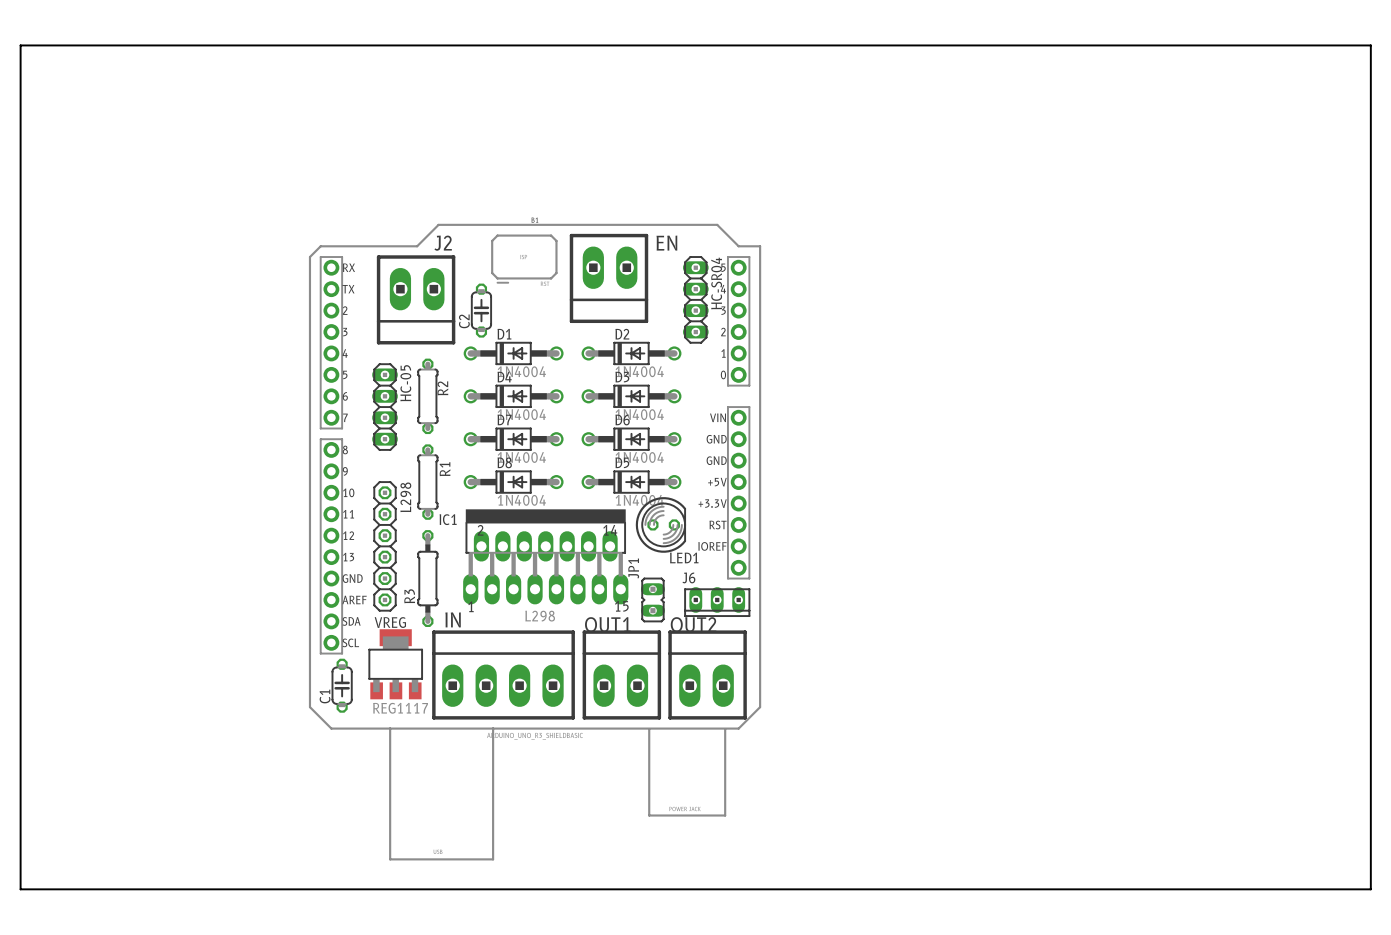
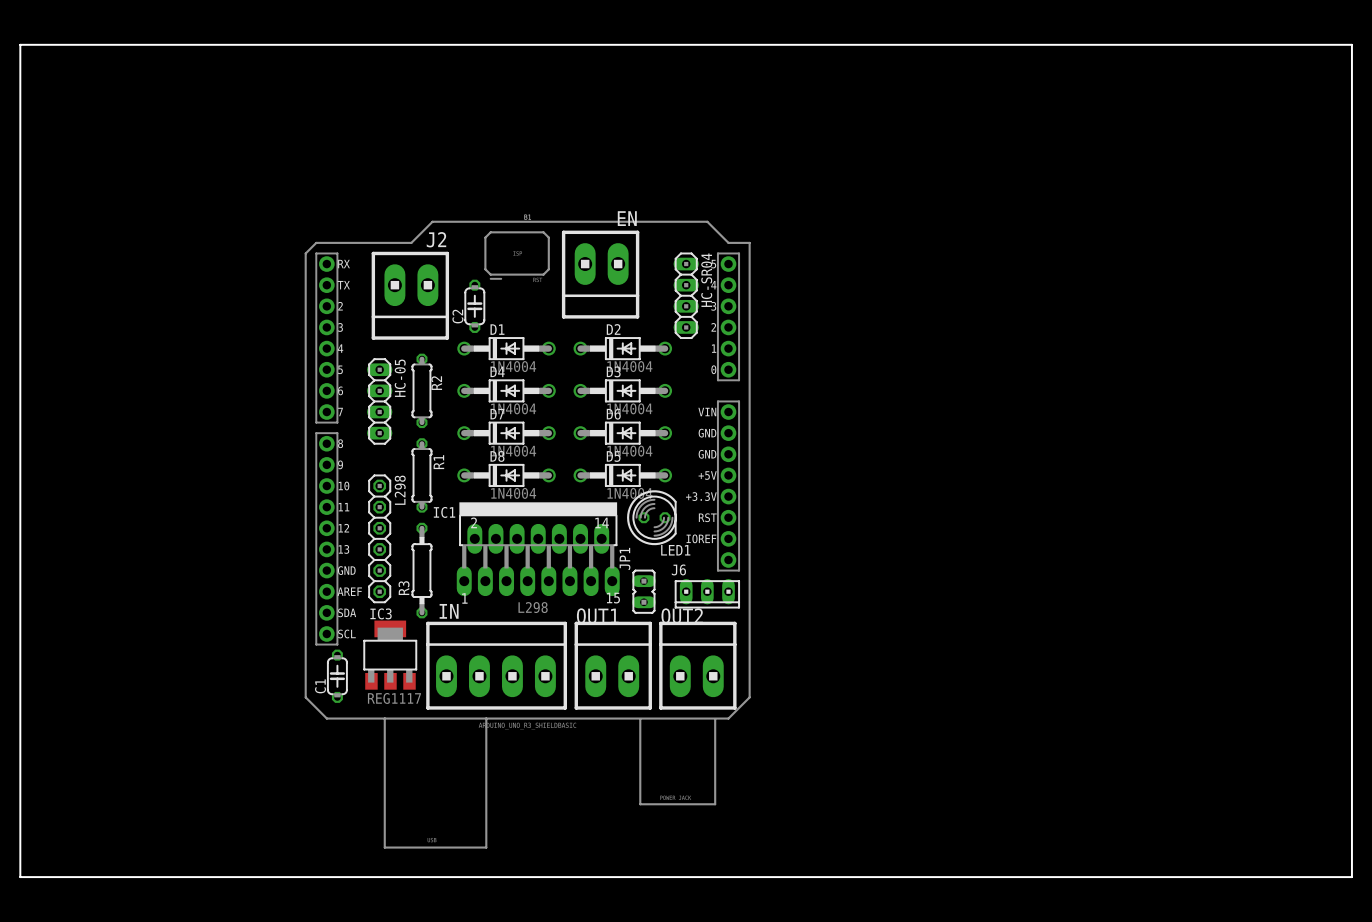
EN name position: EN (666, 243) -> EN (627, 218)
VREG name: VREG (390, 622) -> IC3 (381, 613)

